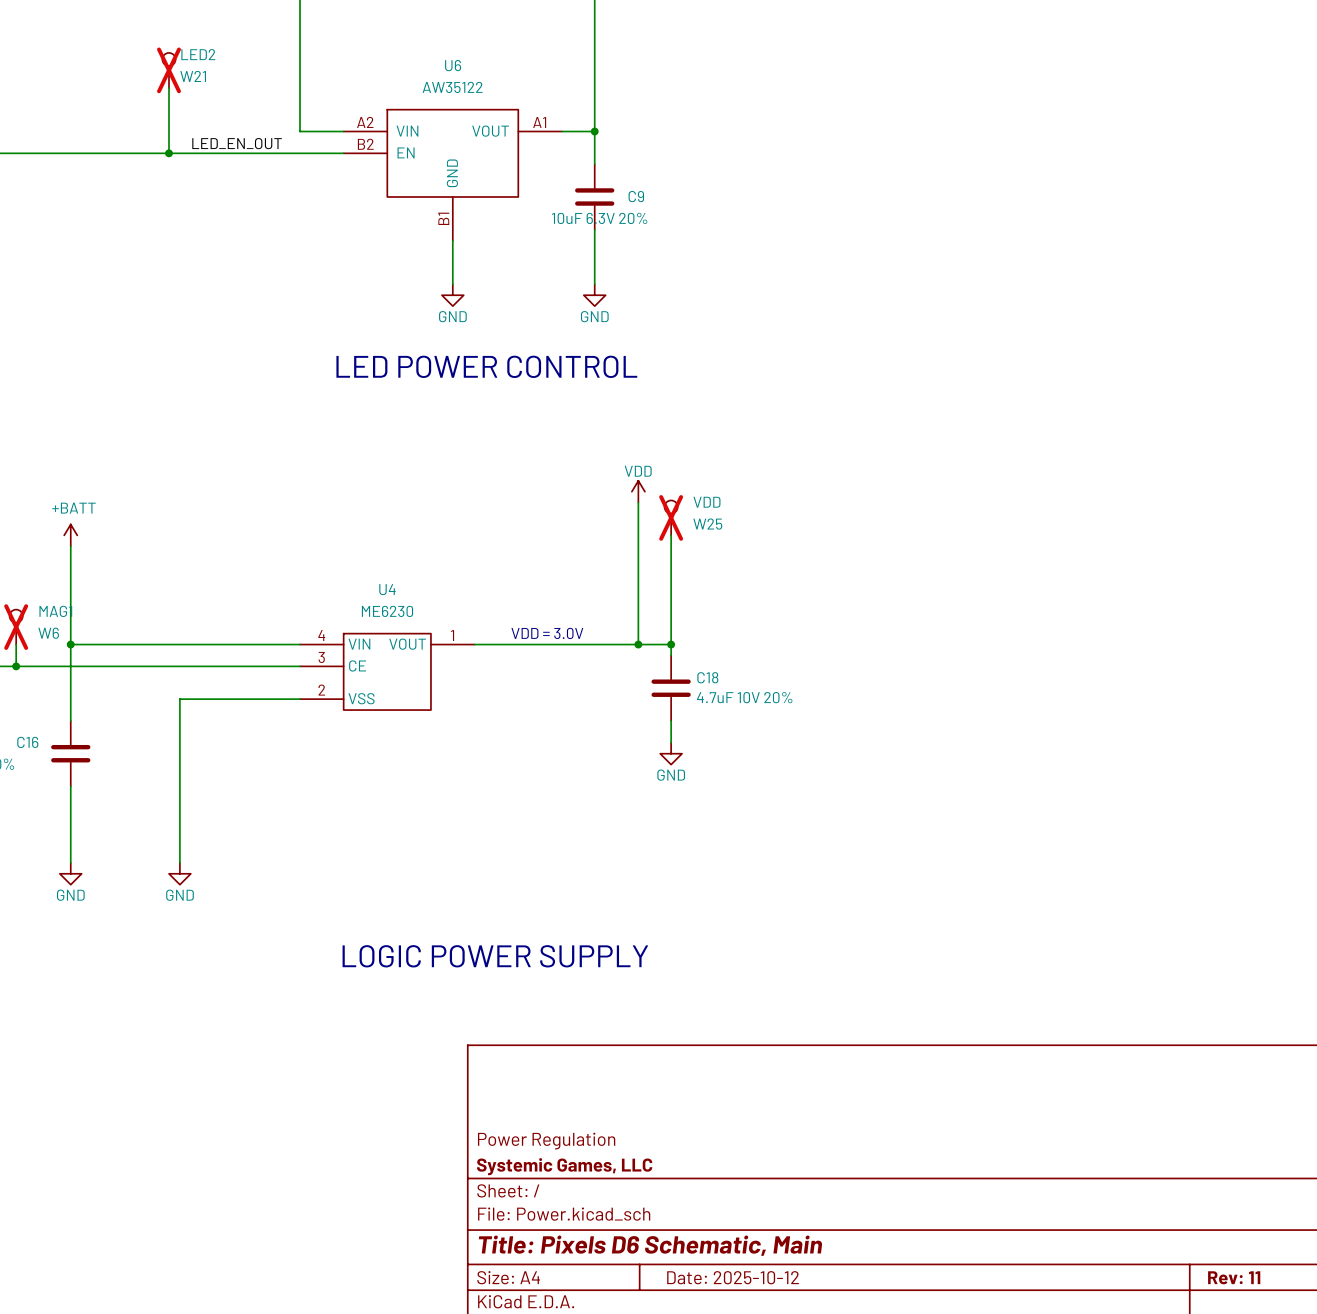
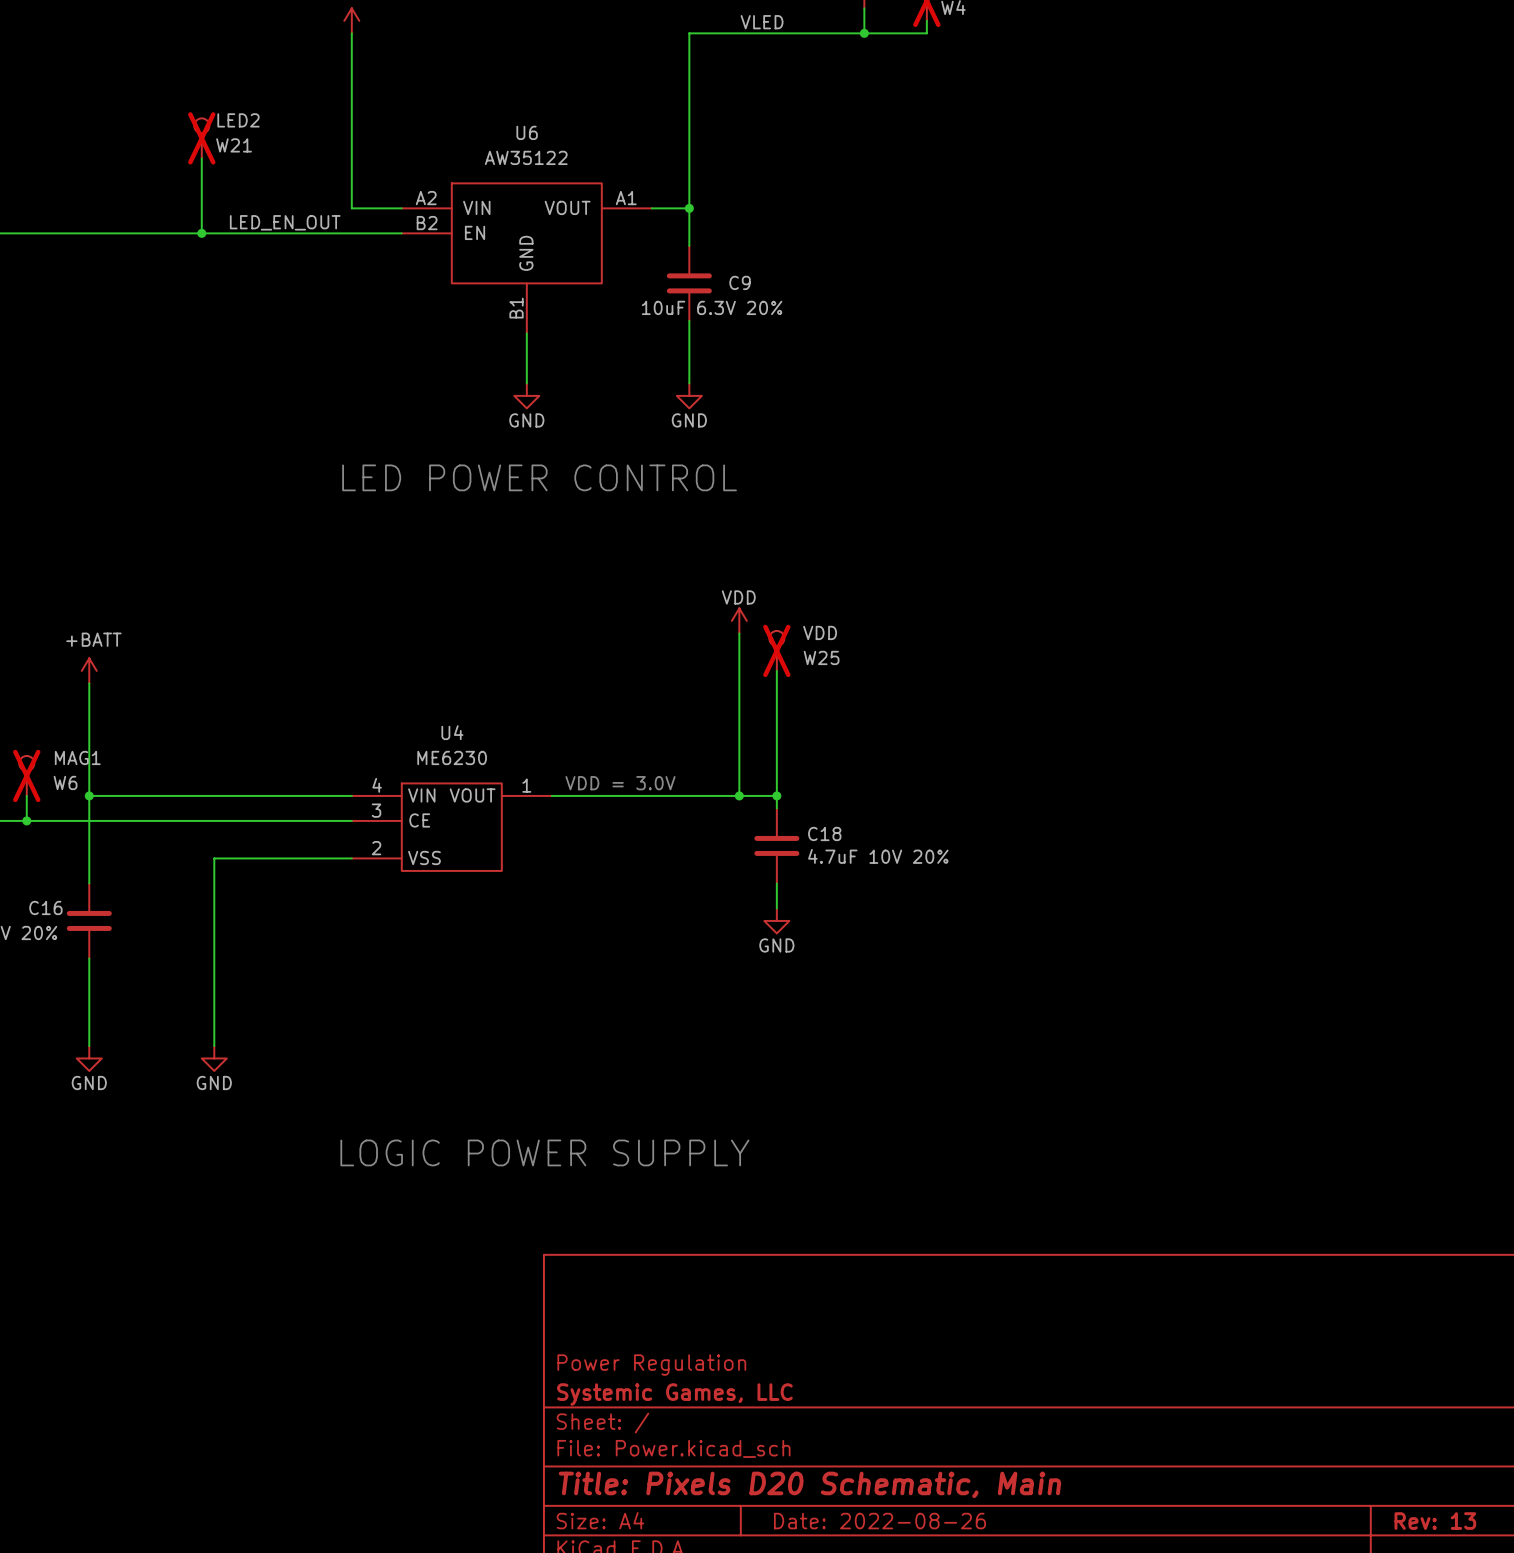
title block: Title: Pixels D6 Schematic, Main (650, 1245) -> Title: Pixels D20 Schematic, Main (809, 1484)
title block: Date: 2025-10-12 (733, 1277) -> Date: 2022-08-26 (879, 1521)
title block: Rev: 11 (1234, 1277) -> Rev: 13 (1435, 1521)

